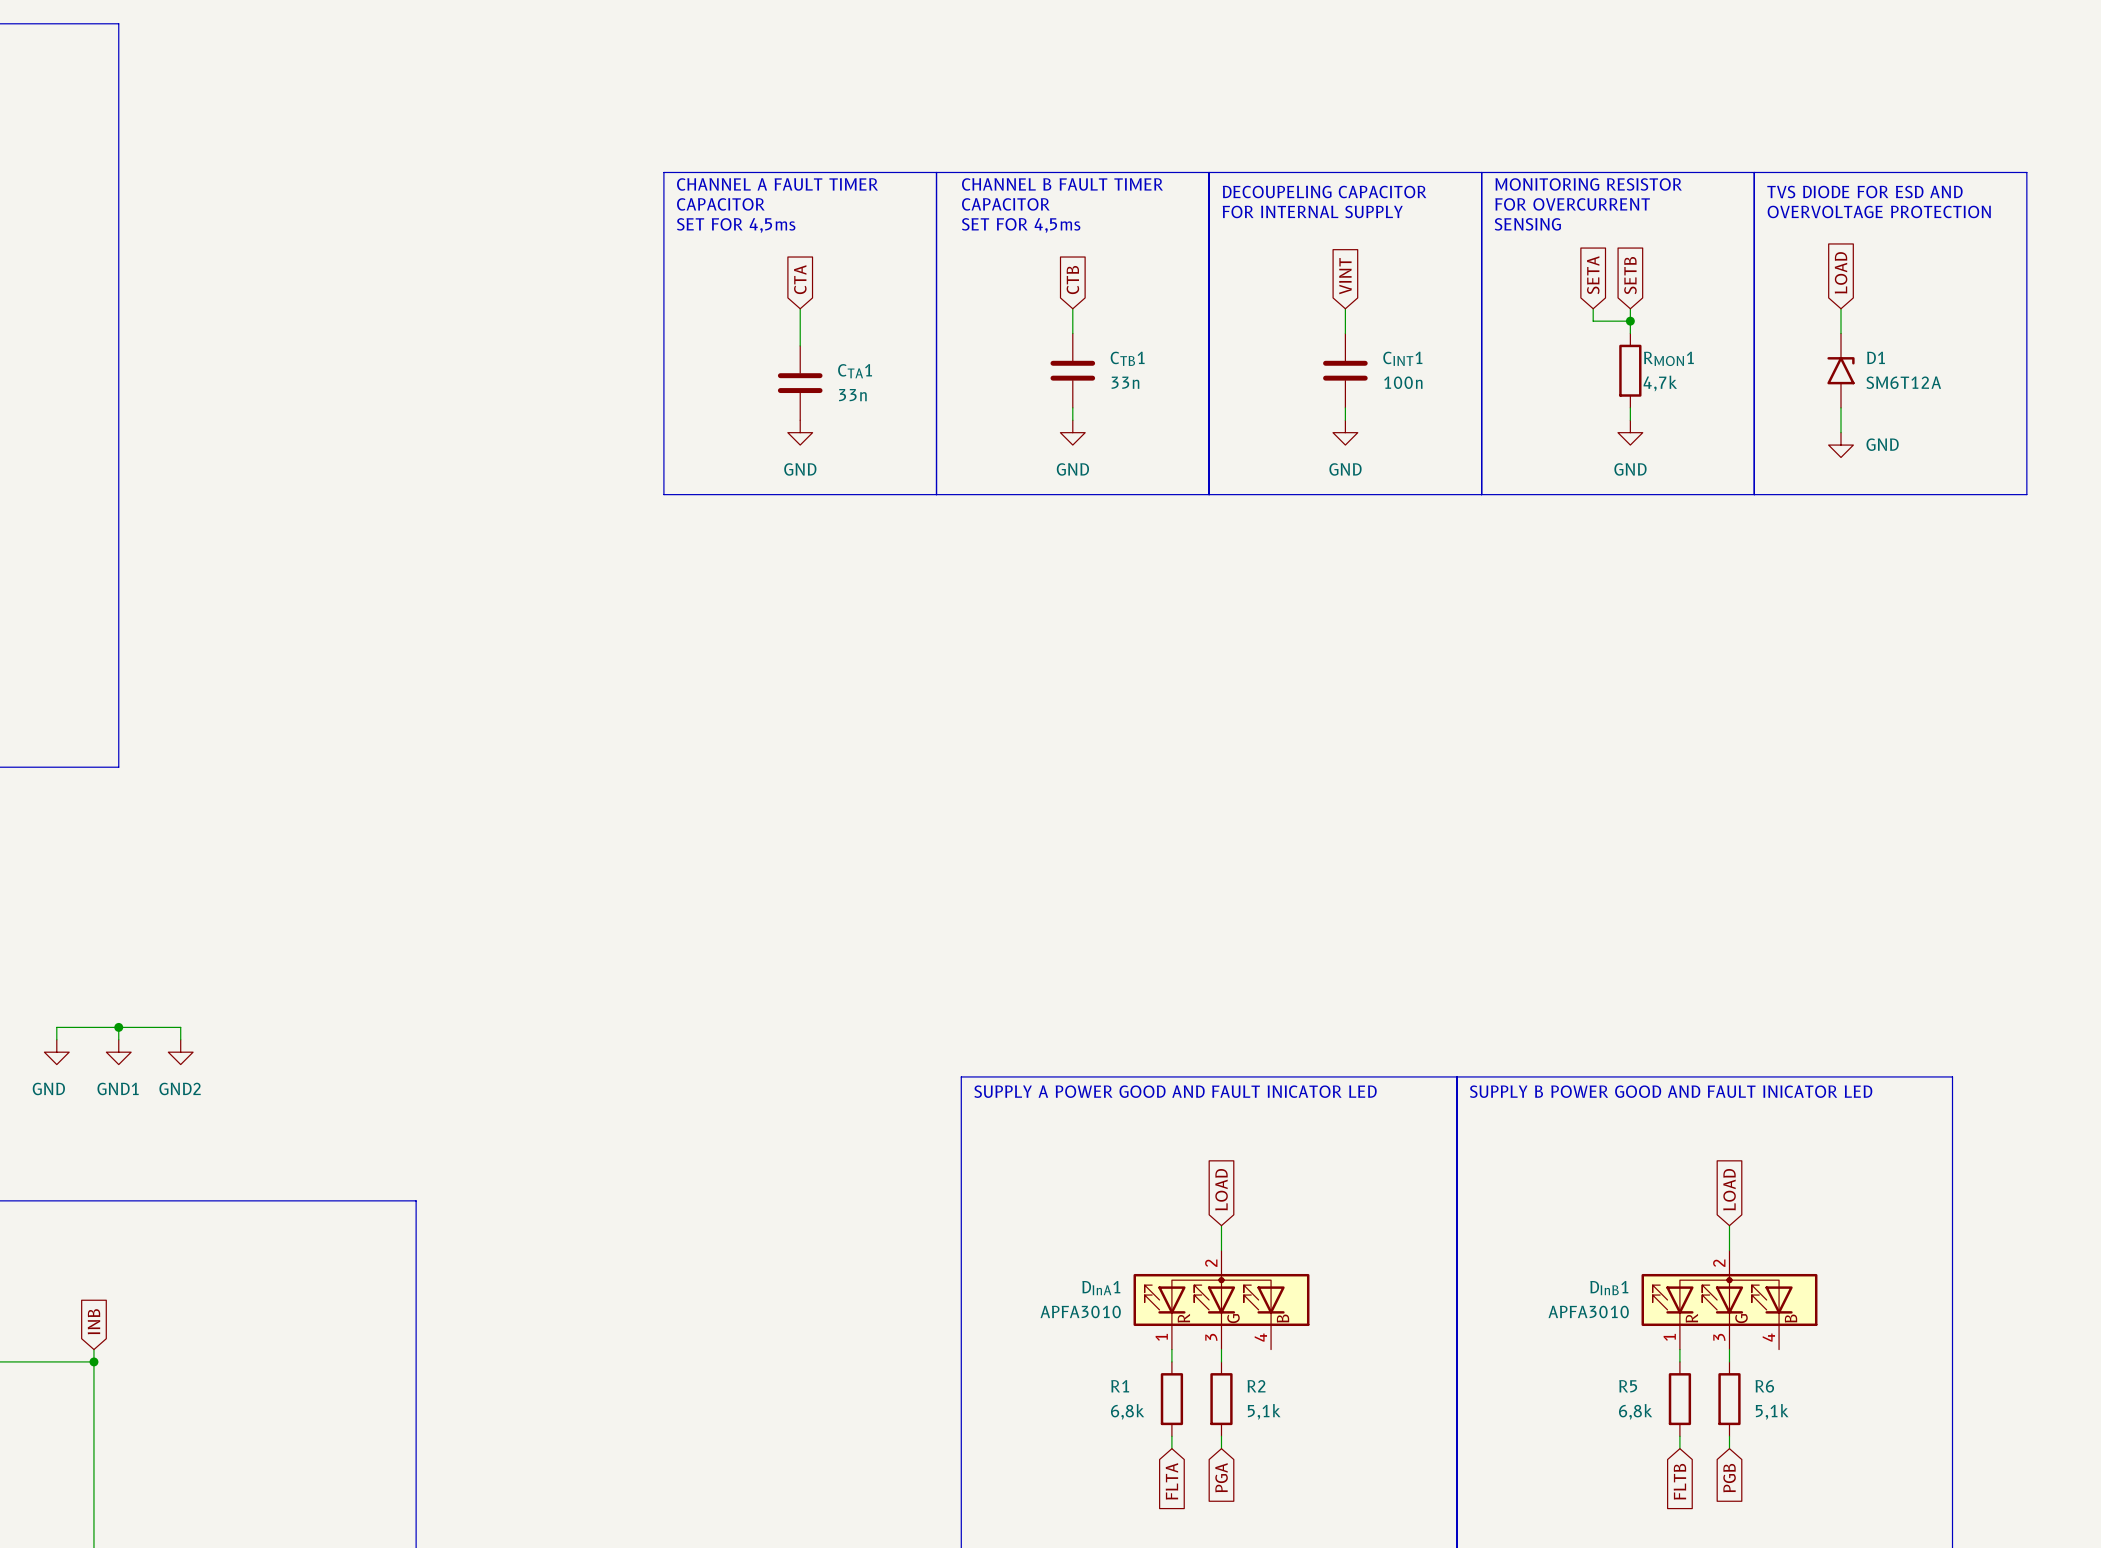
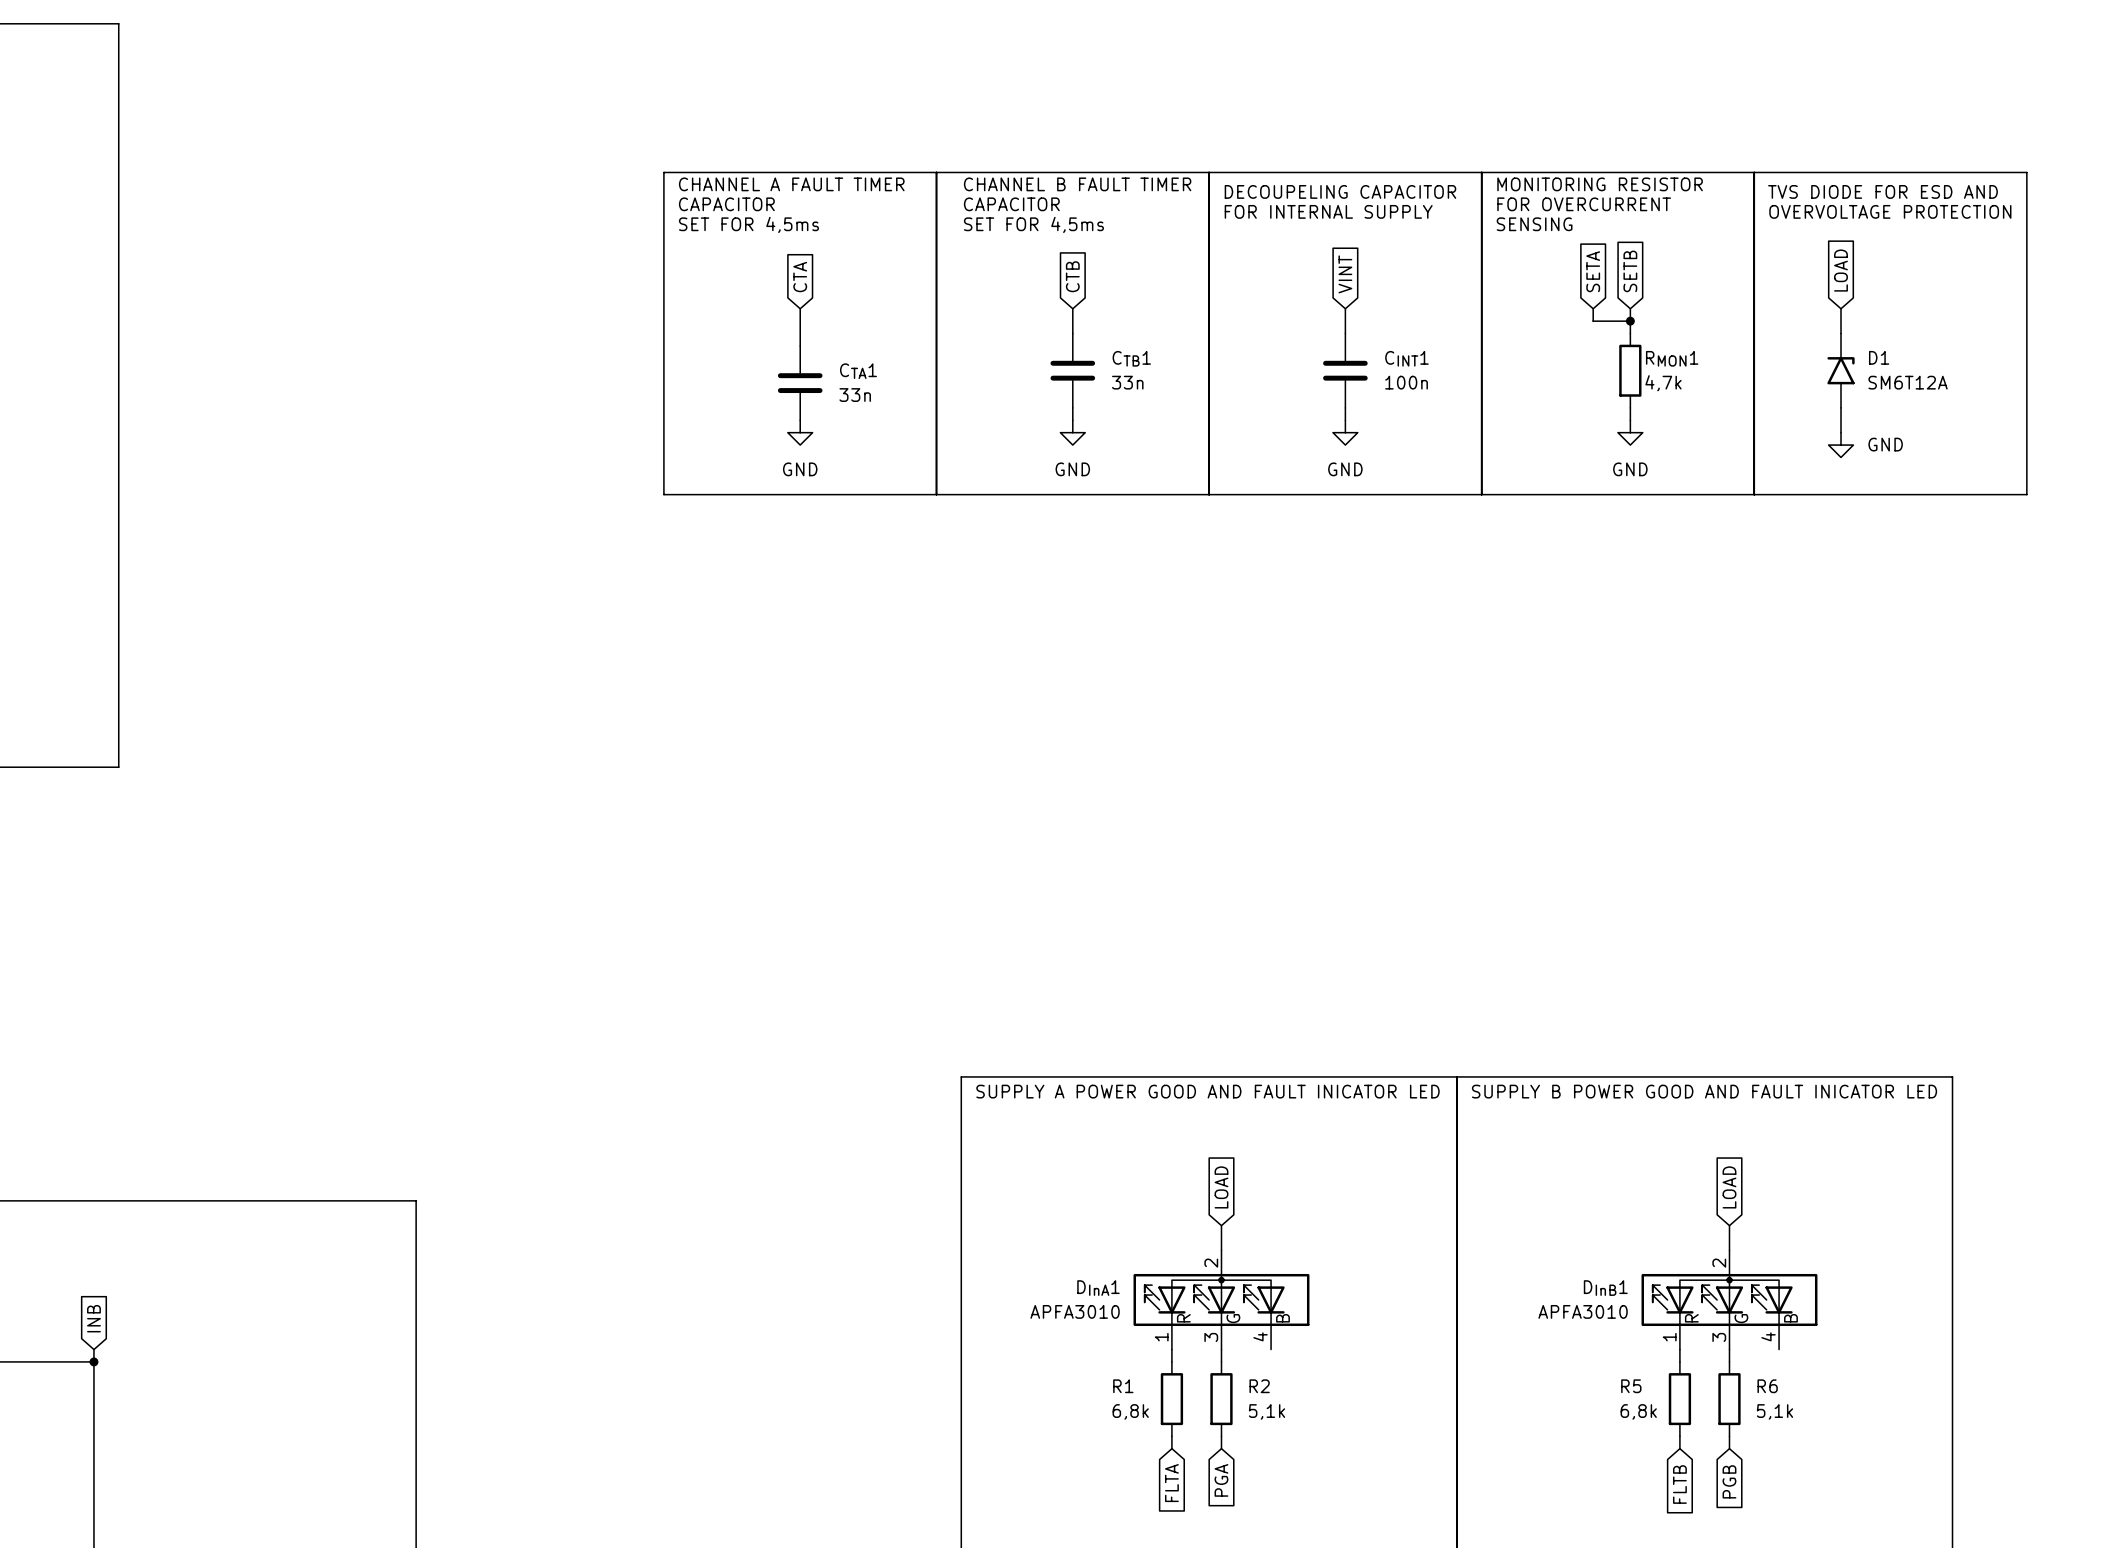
wire: (118, 1027) (118, 1039) -> none
junction: (118, 1027) -> none
wire: (56, 1039) (56, 1027) (180, 1027) (180, 1039) -> none
power symbol: GND (56, 1052) -> none
power symbol: GND1 (118, 1052) -> none
power symbol: GND2 (180, 1052) -> none

